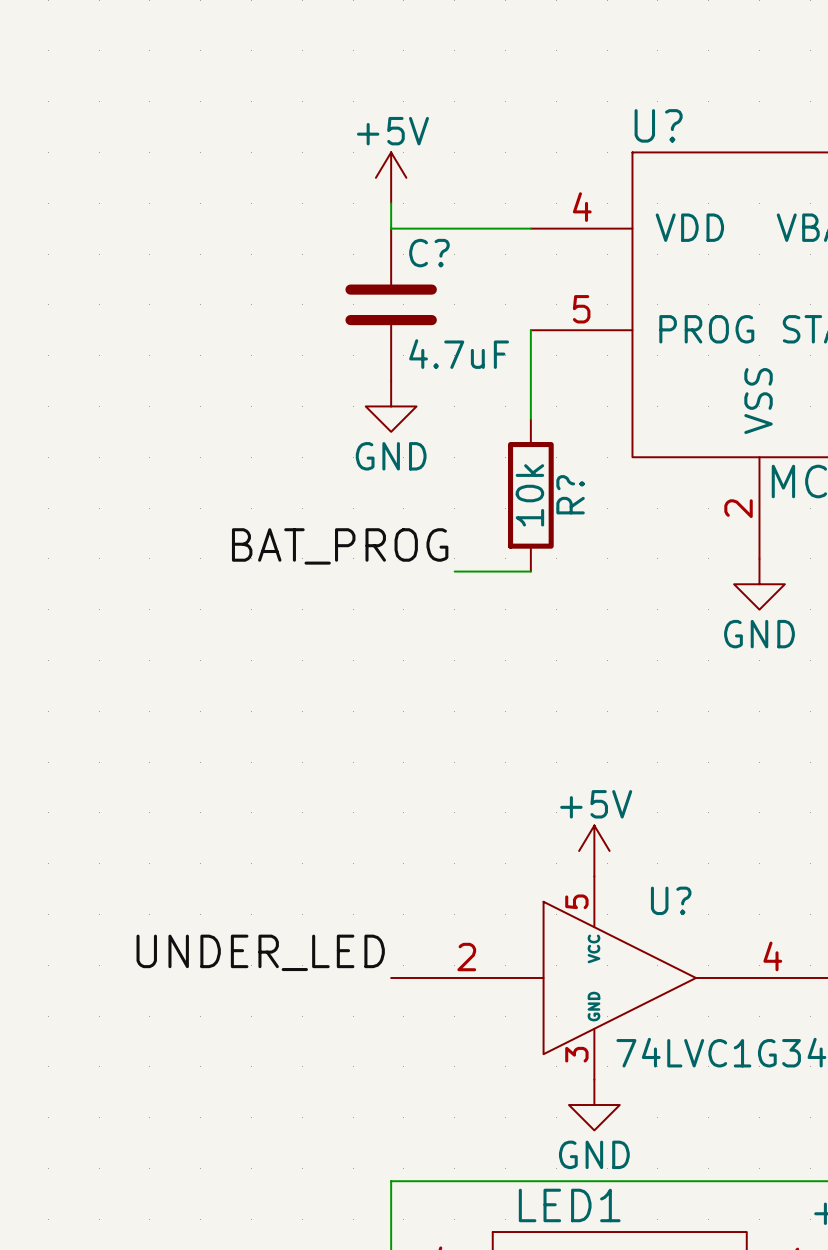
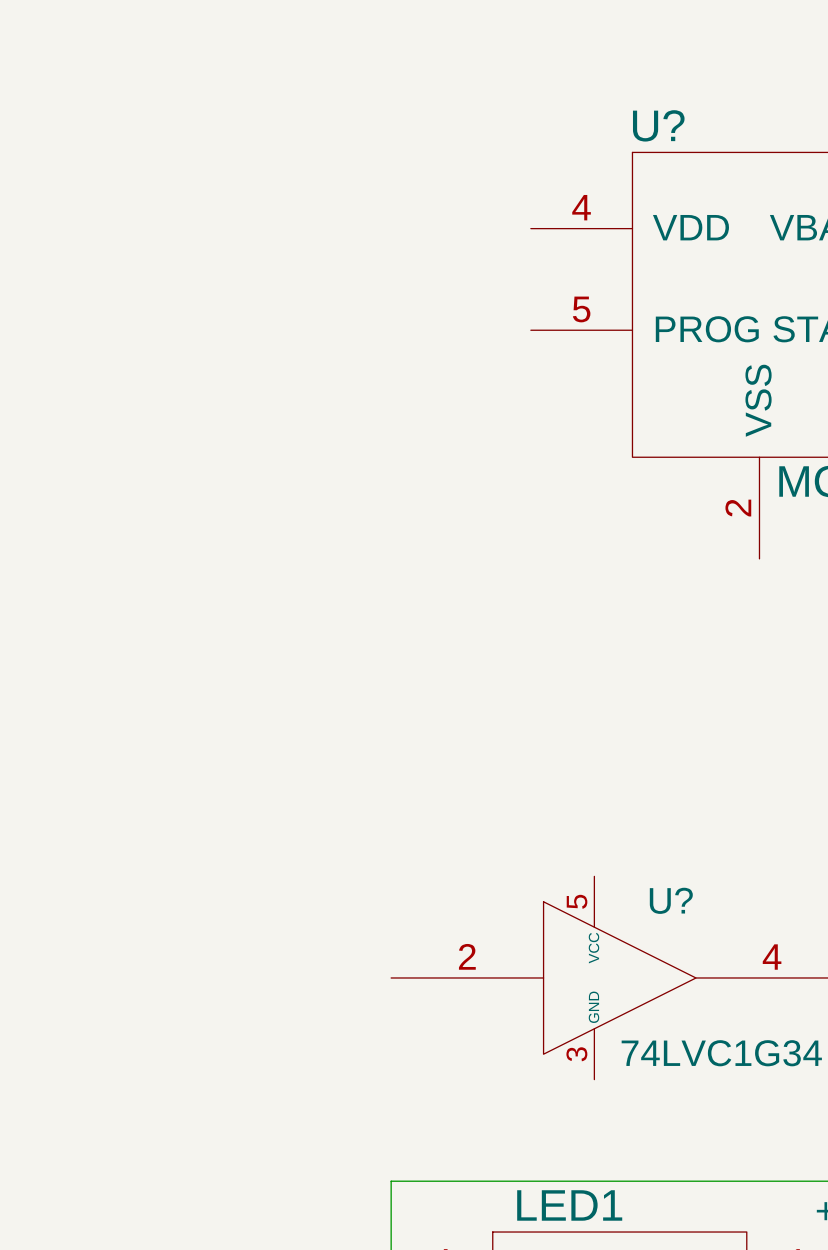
power symbol: +5V (391, 177) -> none
wire: (391, 203) (391, 228) (530, 228) -> none
C?: 4.7uF (391, 304) -> none
wire: (530, 330) (530, 419) -> none
power symbol: GND (391, 406) -> none
R?: 10k (530, 495) -> none
label: BAT_PROG (340, 546) -> none
wire: (454, 571) (530, 571) -> none
power symbol: GND (759, 584) -> none
power symbol: +5V (594, 850) -> none
label: UNDER_LED (260, 952) -> none
power symbol: GND (594, 1105) -> none

